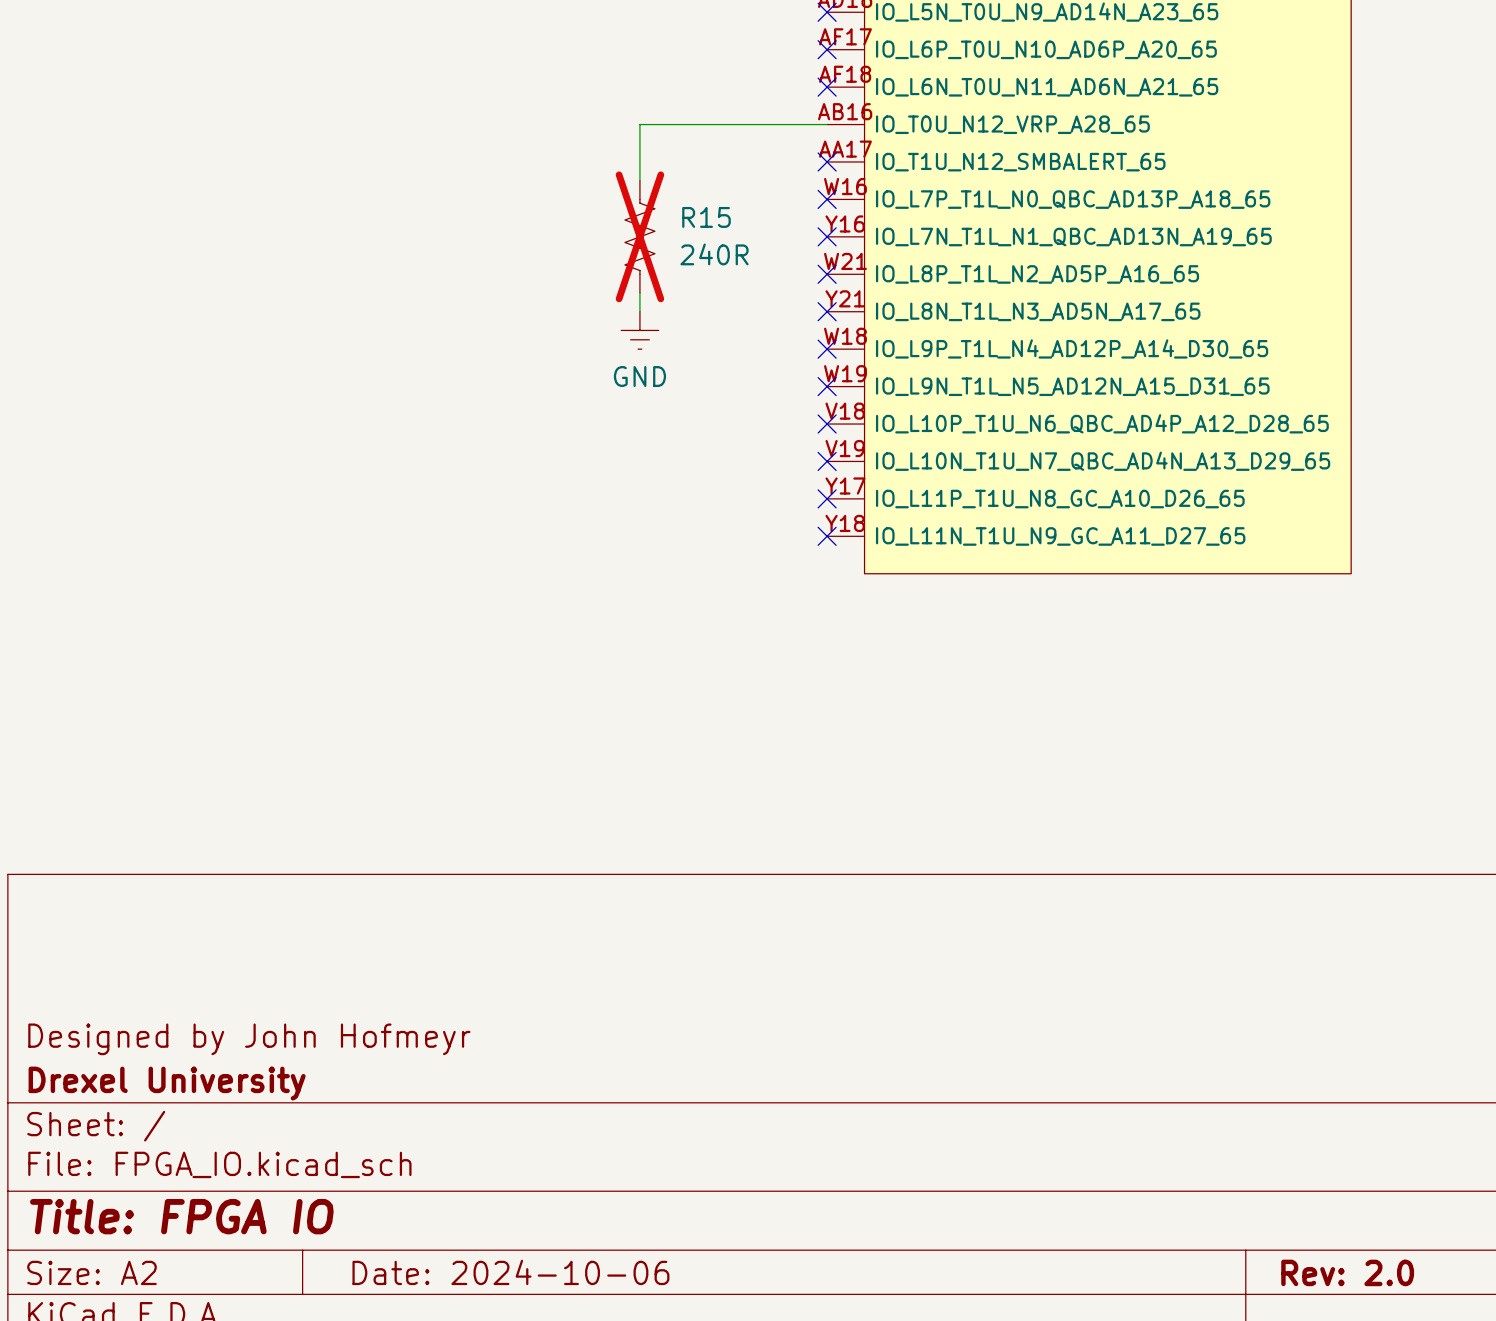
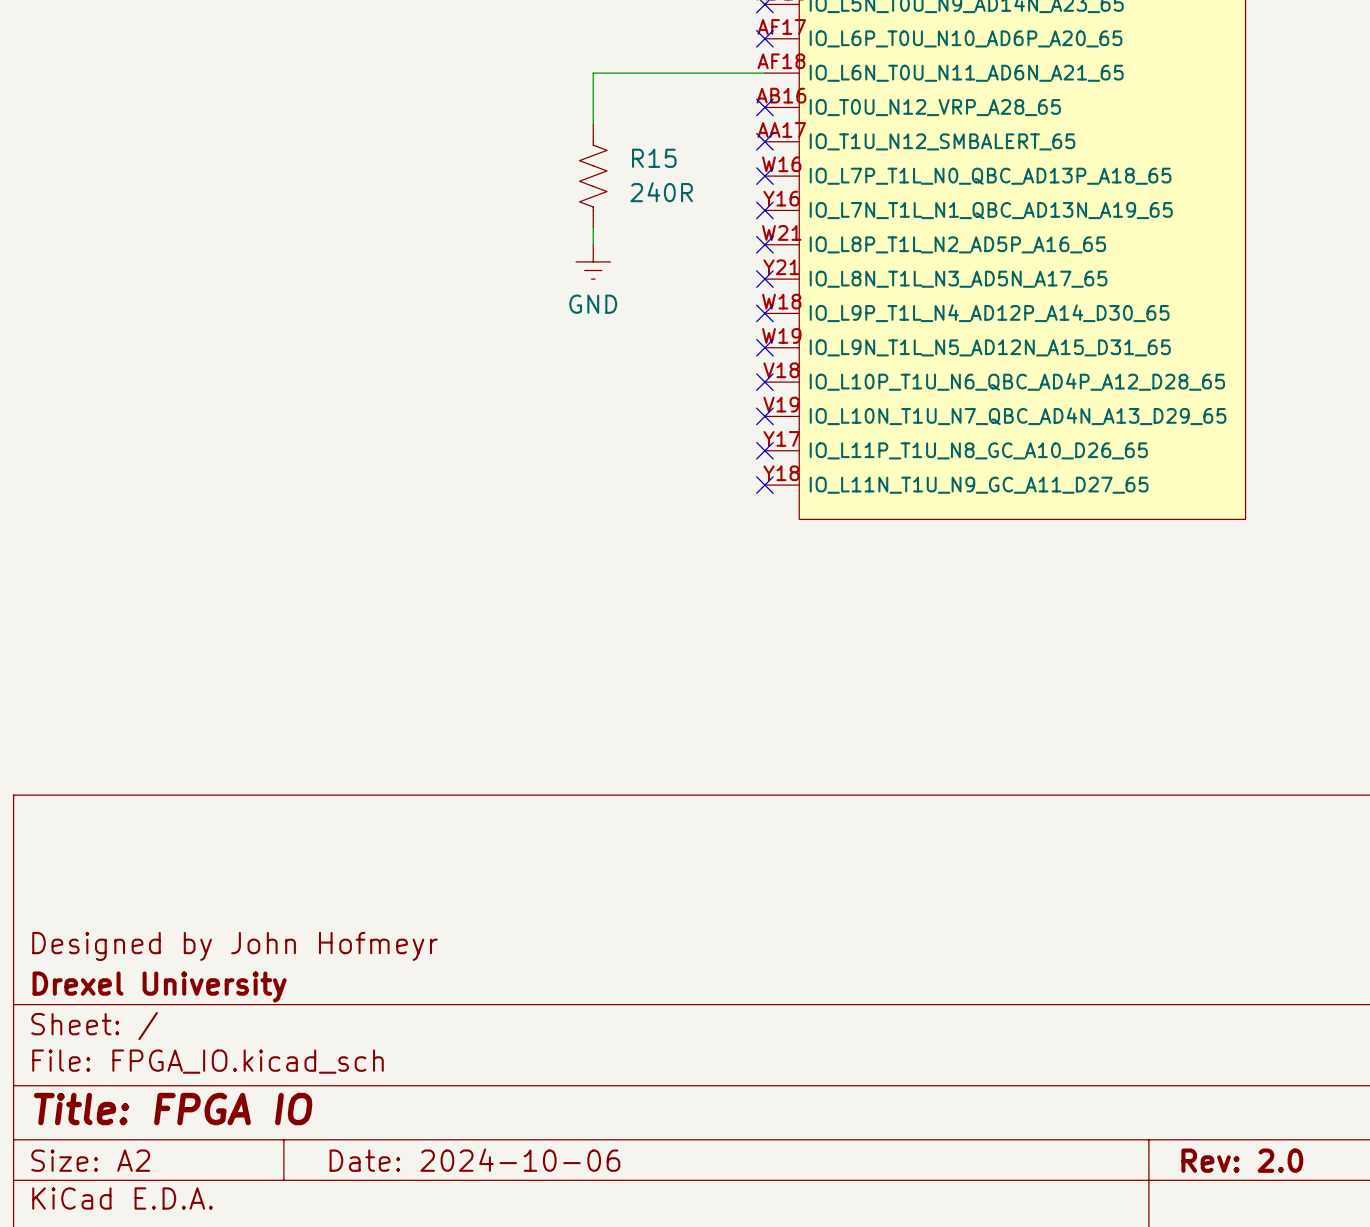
no-connect mark position: (827, 87) -> (764, 107)
wire: (639, 124) (827, 124) -> (593, 107) (593, 73) (764, 73)
R15 position: (639, 236) -> (593, 176)
R15 do-not-place cross: (639, 236) -> none
wire: (639, 293) (639, 311) -> (593, 227) (593, 244)
power symbol position: GND (639, 330) -> GND (593, 261)

